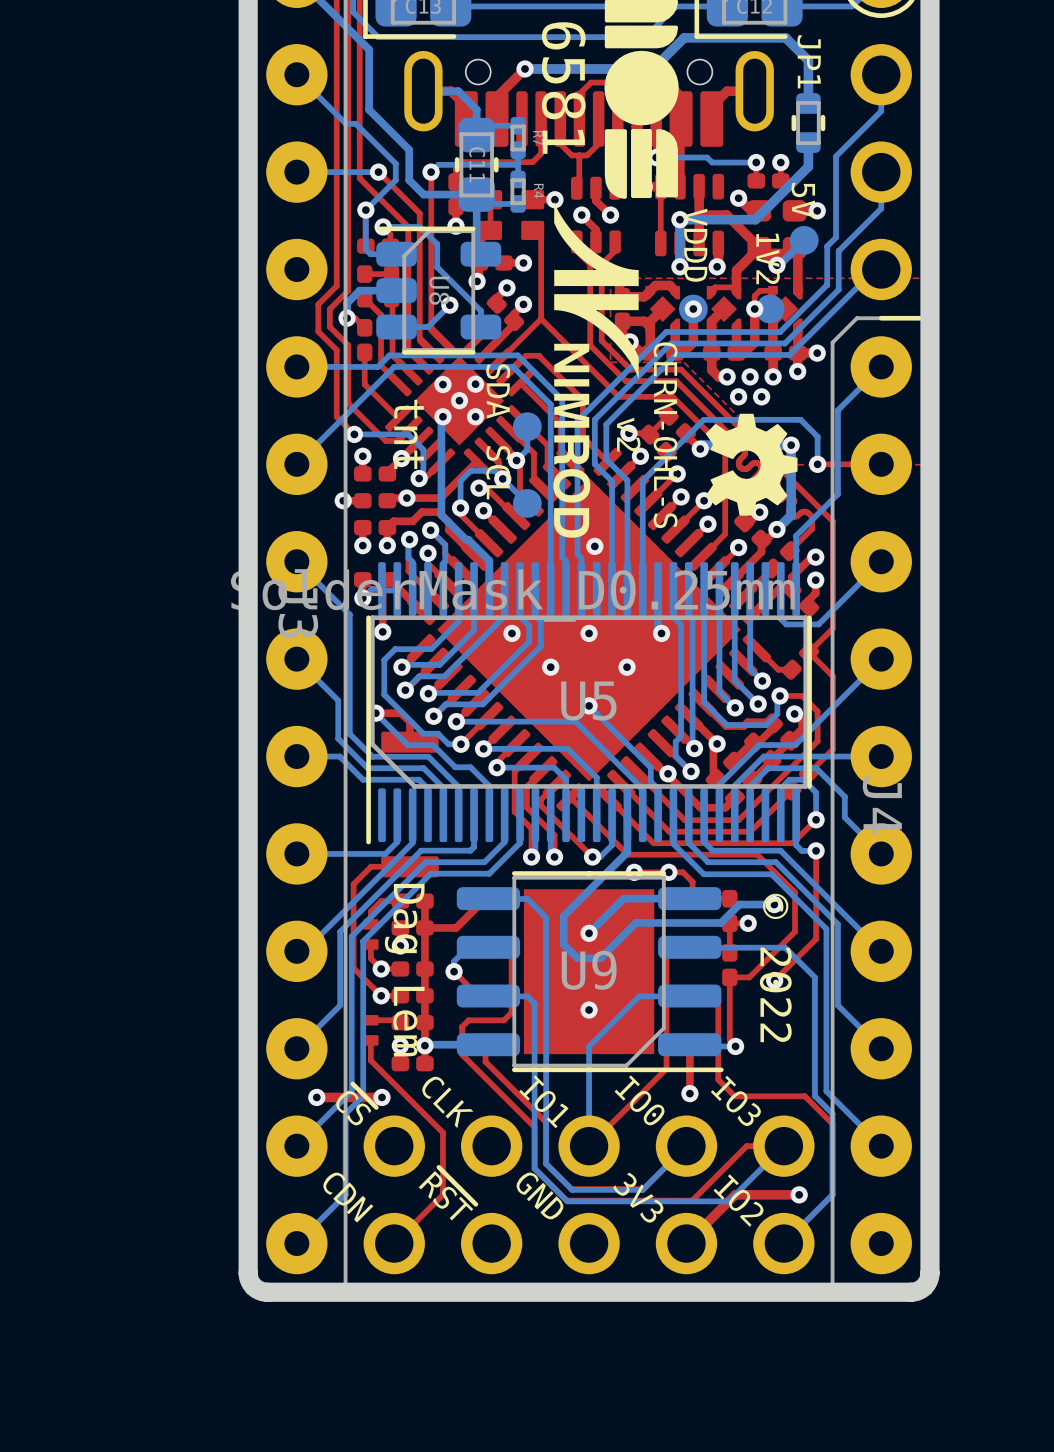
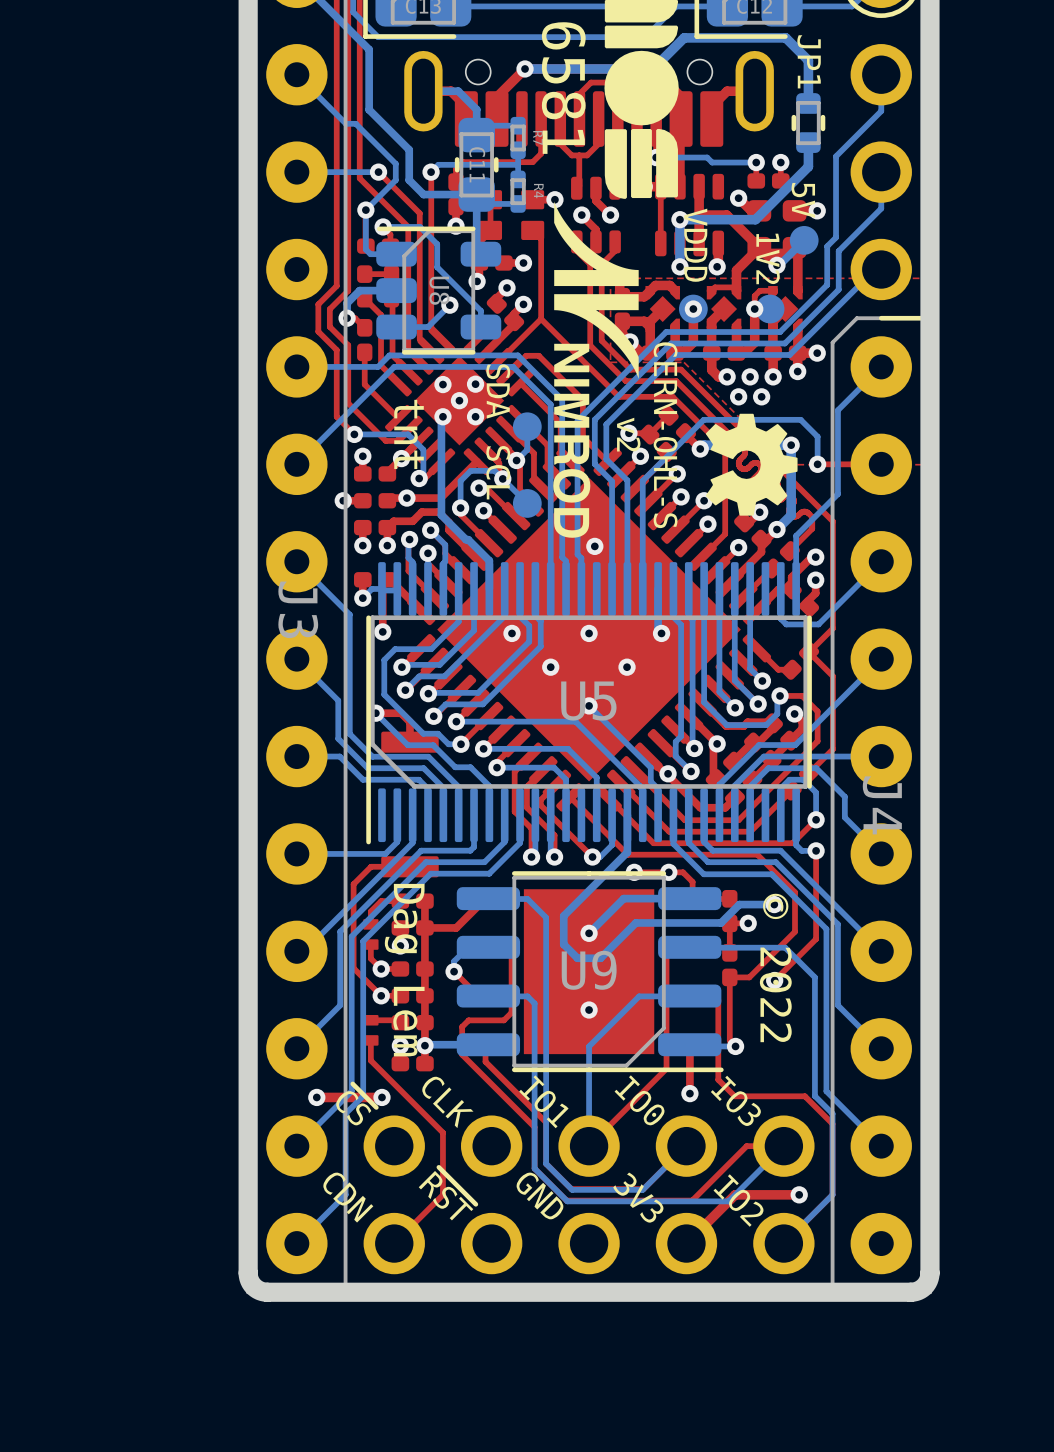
drawing: [230, 569, 795, 622] -> none

